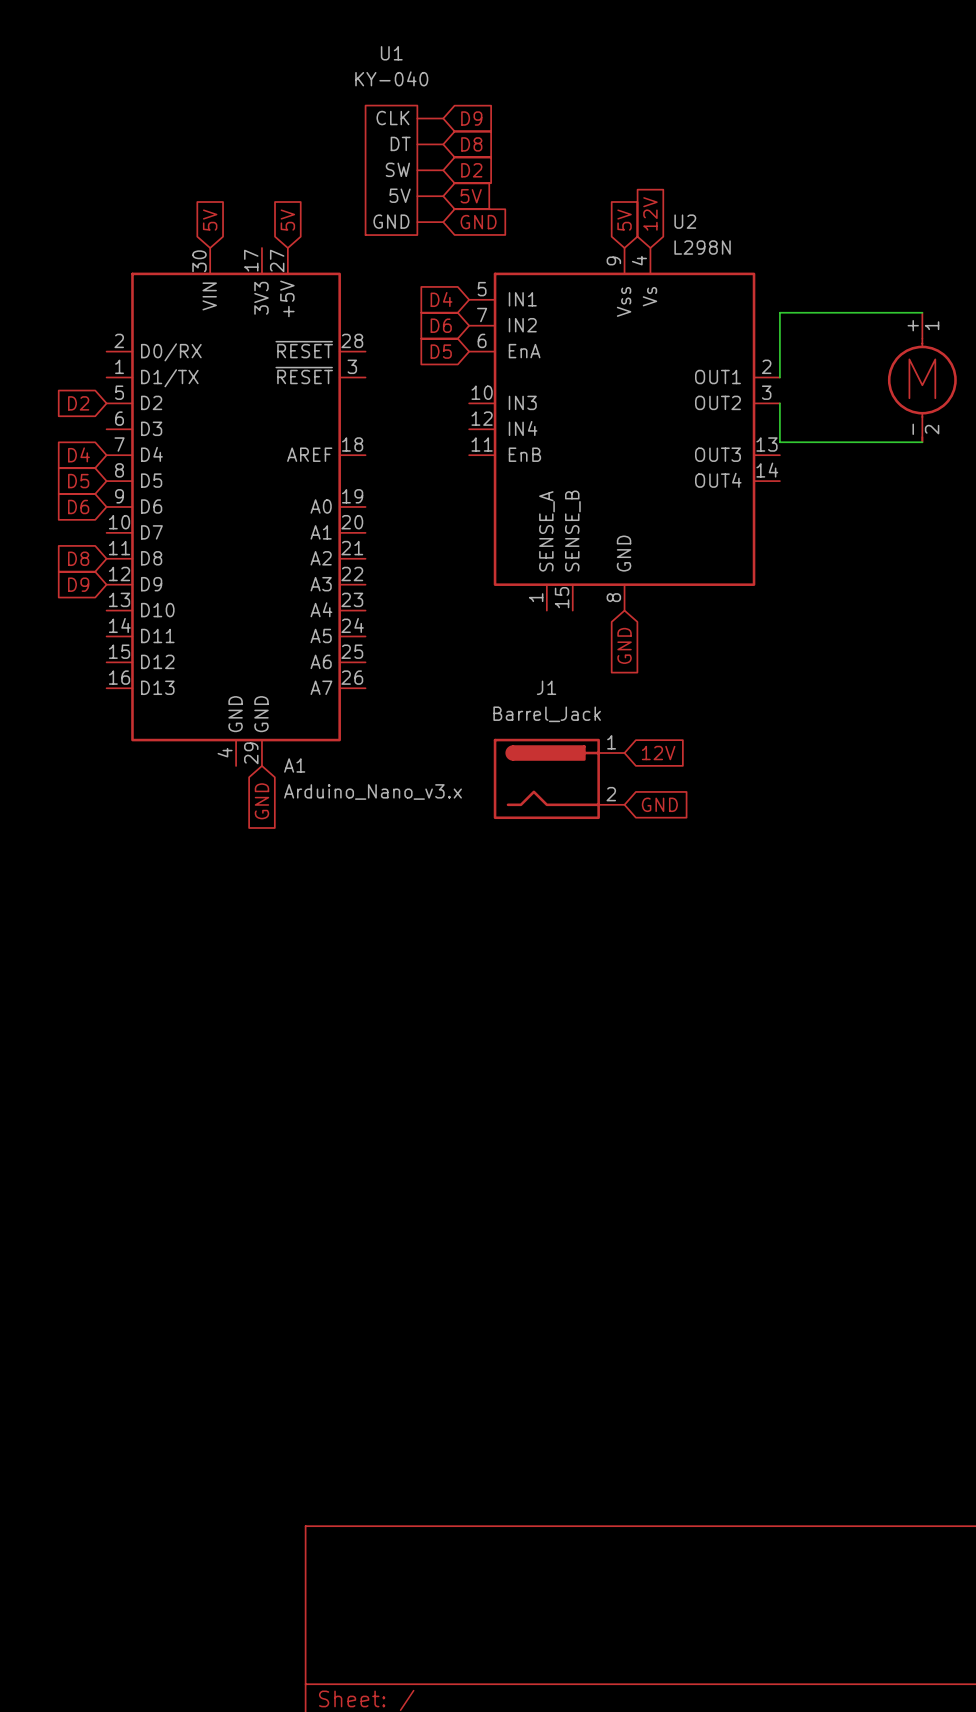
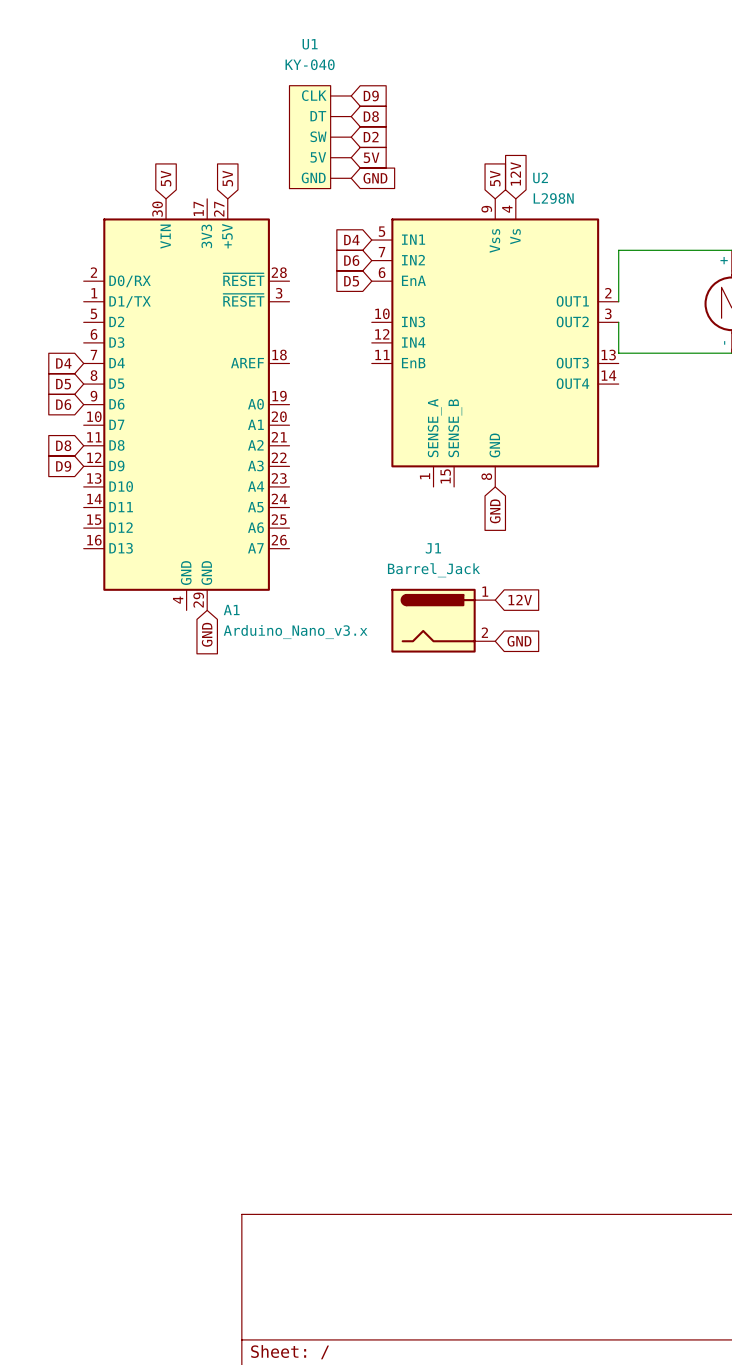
global label: D2 (78, 403) -> none

